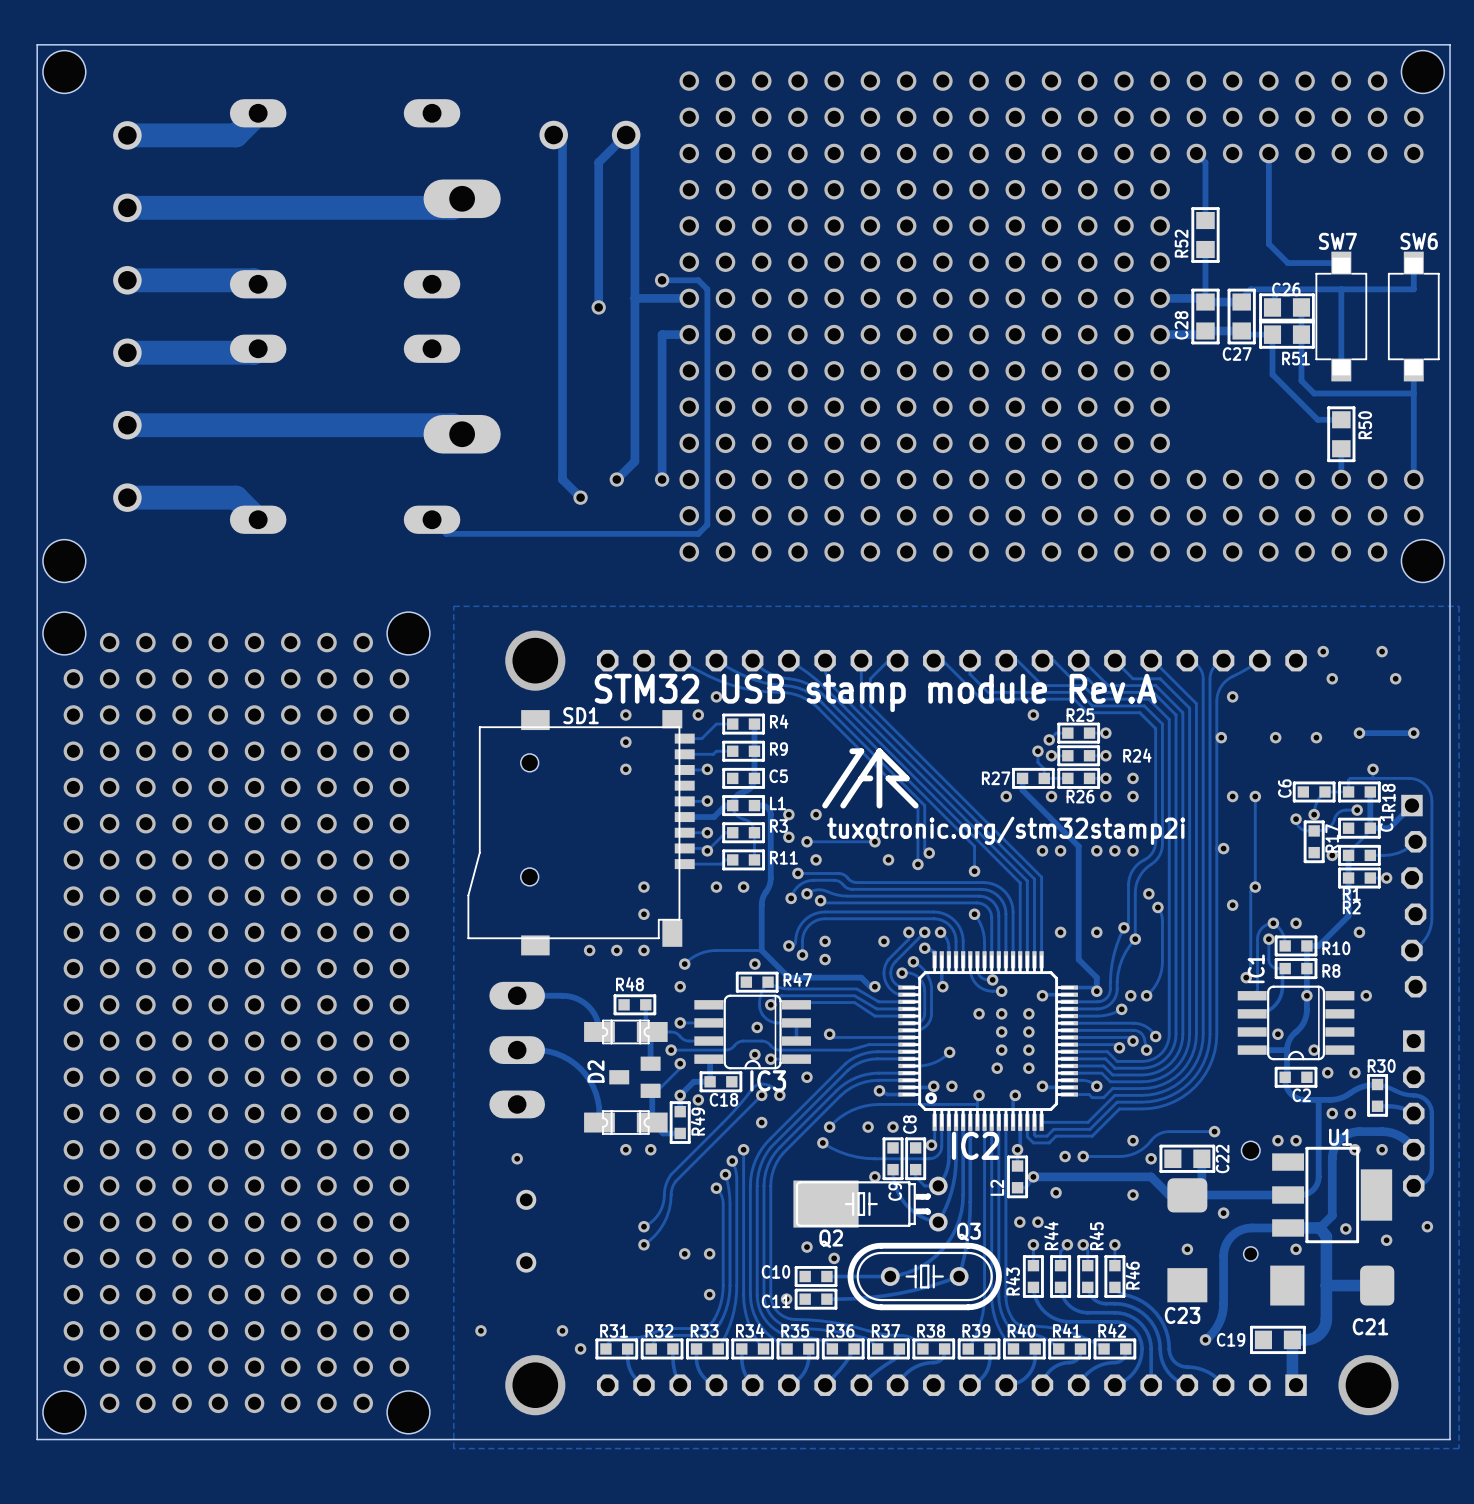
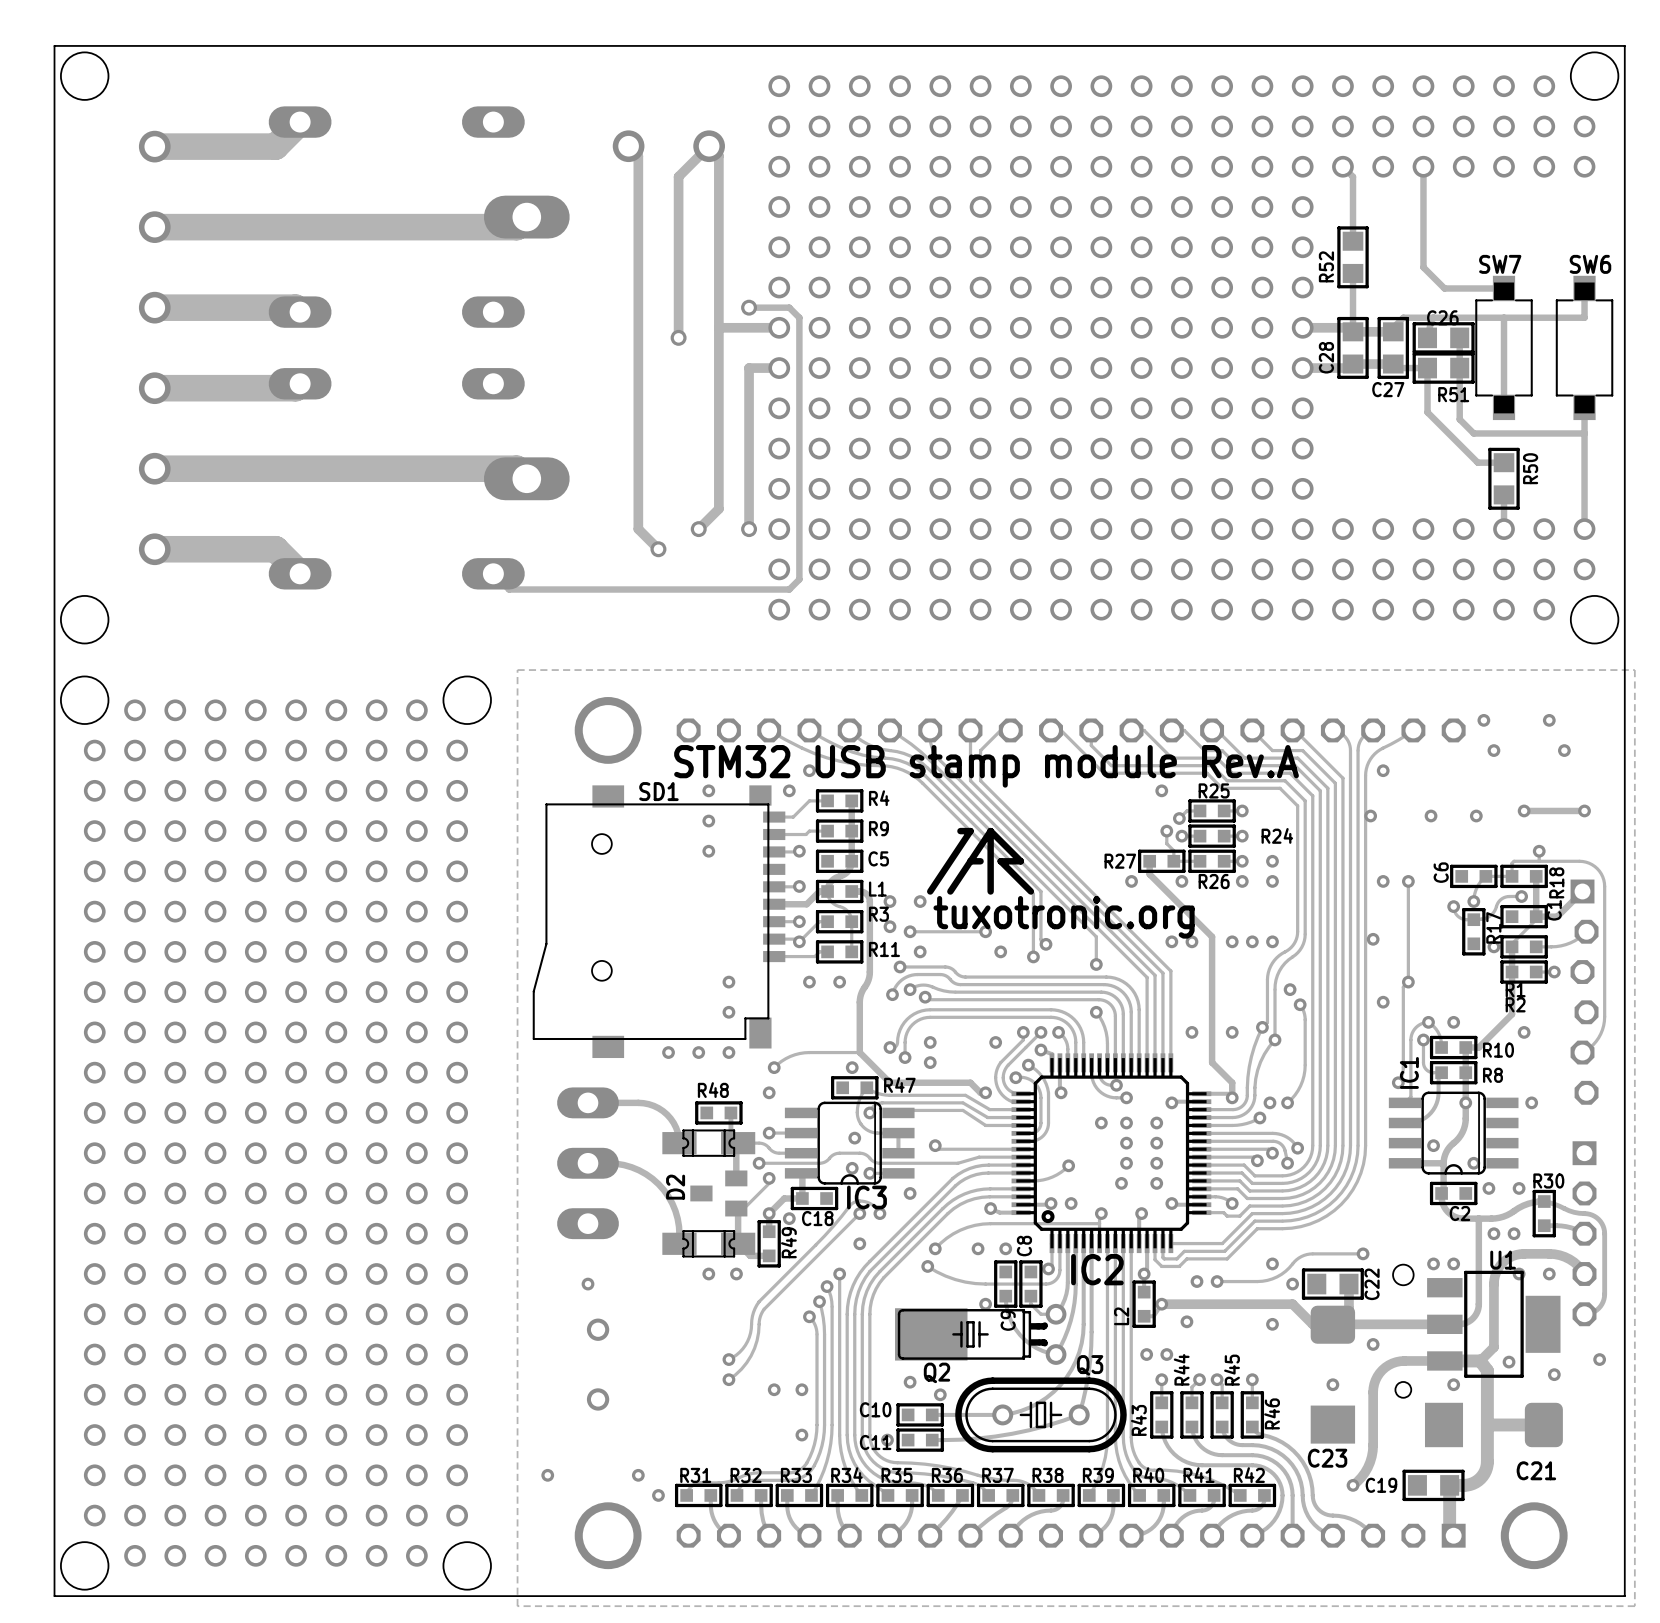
text: tuxotronic.org/stm32stamp2i (1006, 830) -> tuxotronic.org (1064, 917)

